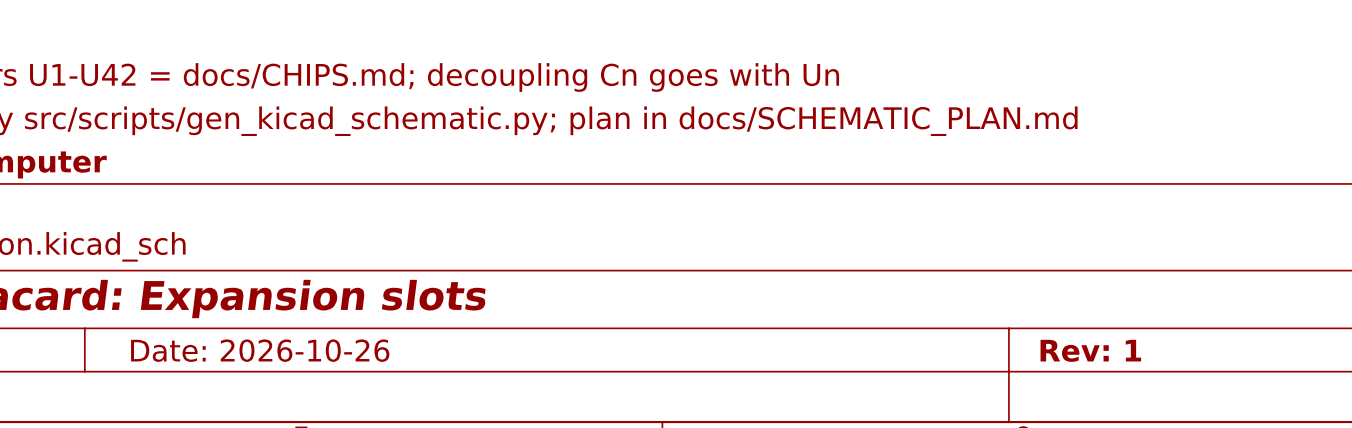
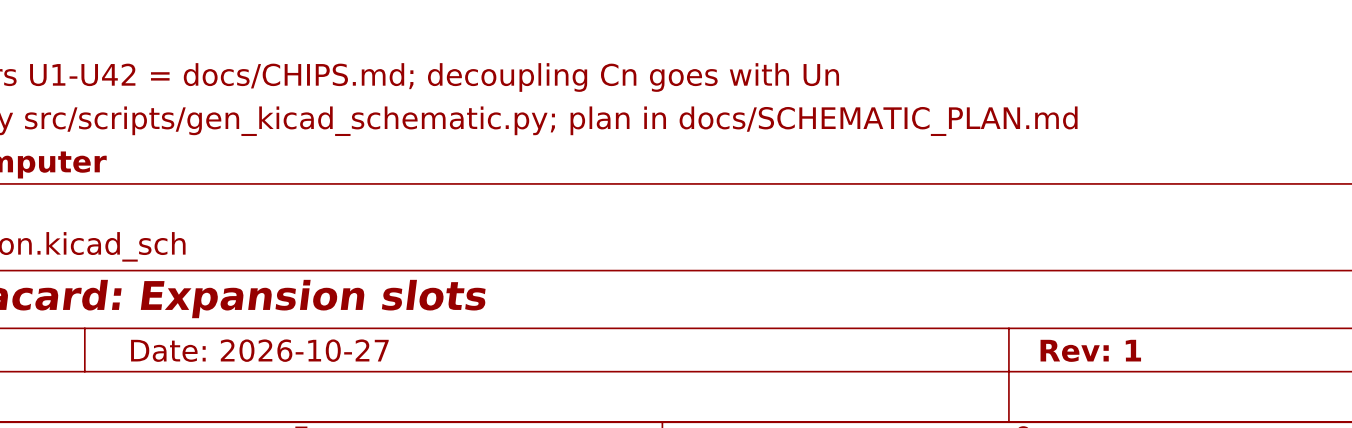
title block: Date: 2026-10-26 (260, 350) -> Date: 2026-10-27 (259, 350)

